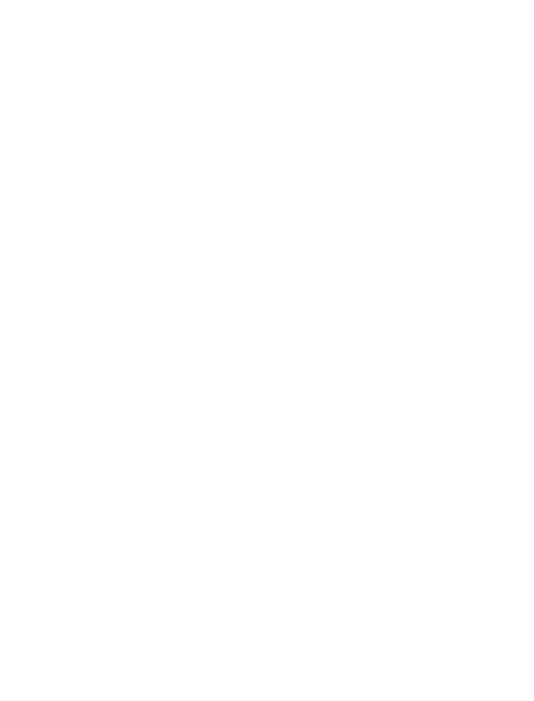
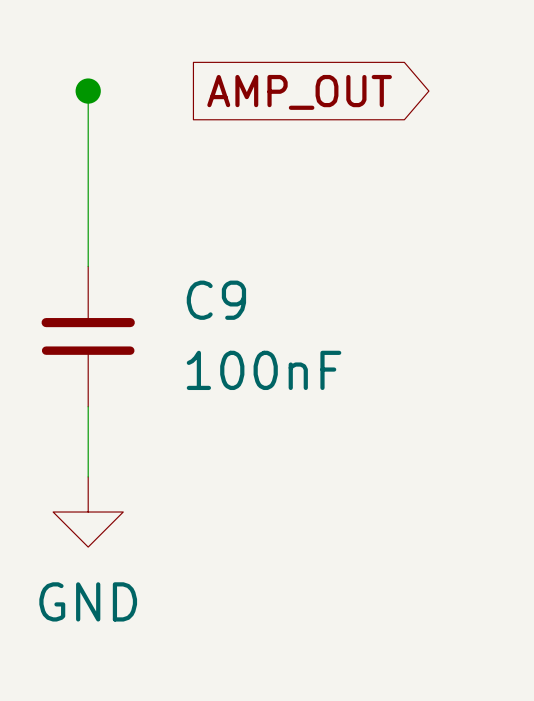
wire: none -> (88, 91) (88, 266)
junction: none -> (88, 91)
global label: none -> AMP_OUT (299, 92)
C9: none -> 100nF (88, 336)
wire: none -> (88, 406) (88, 476)
power symbol: none -> GND (88, 512)

